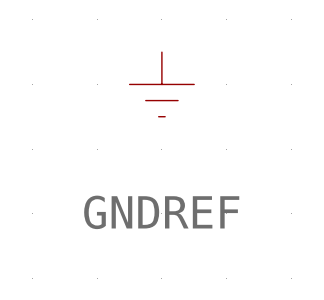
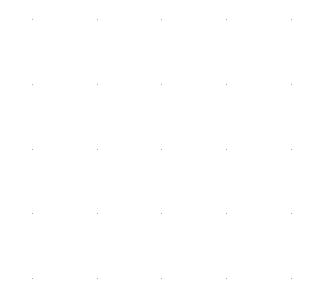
power symbol: GNDREF (161, 84) -> none

